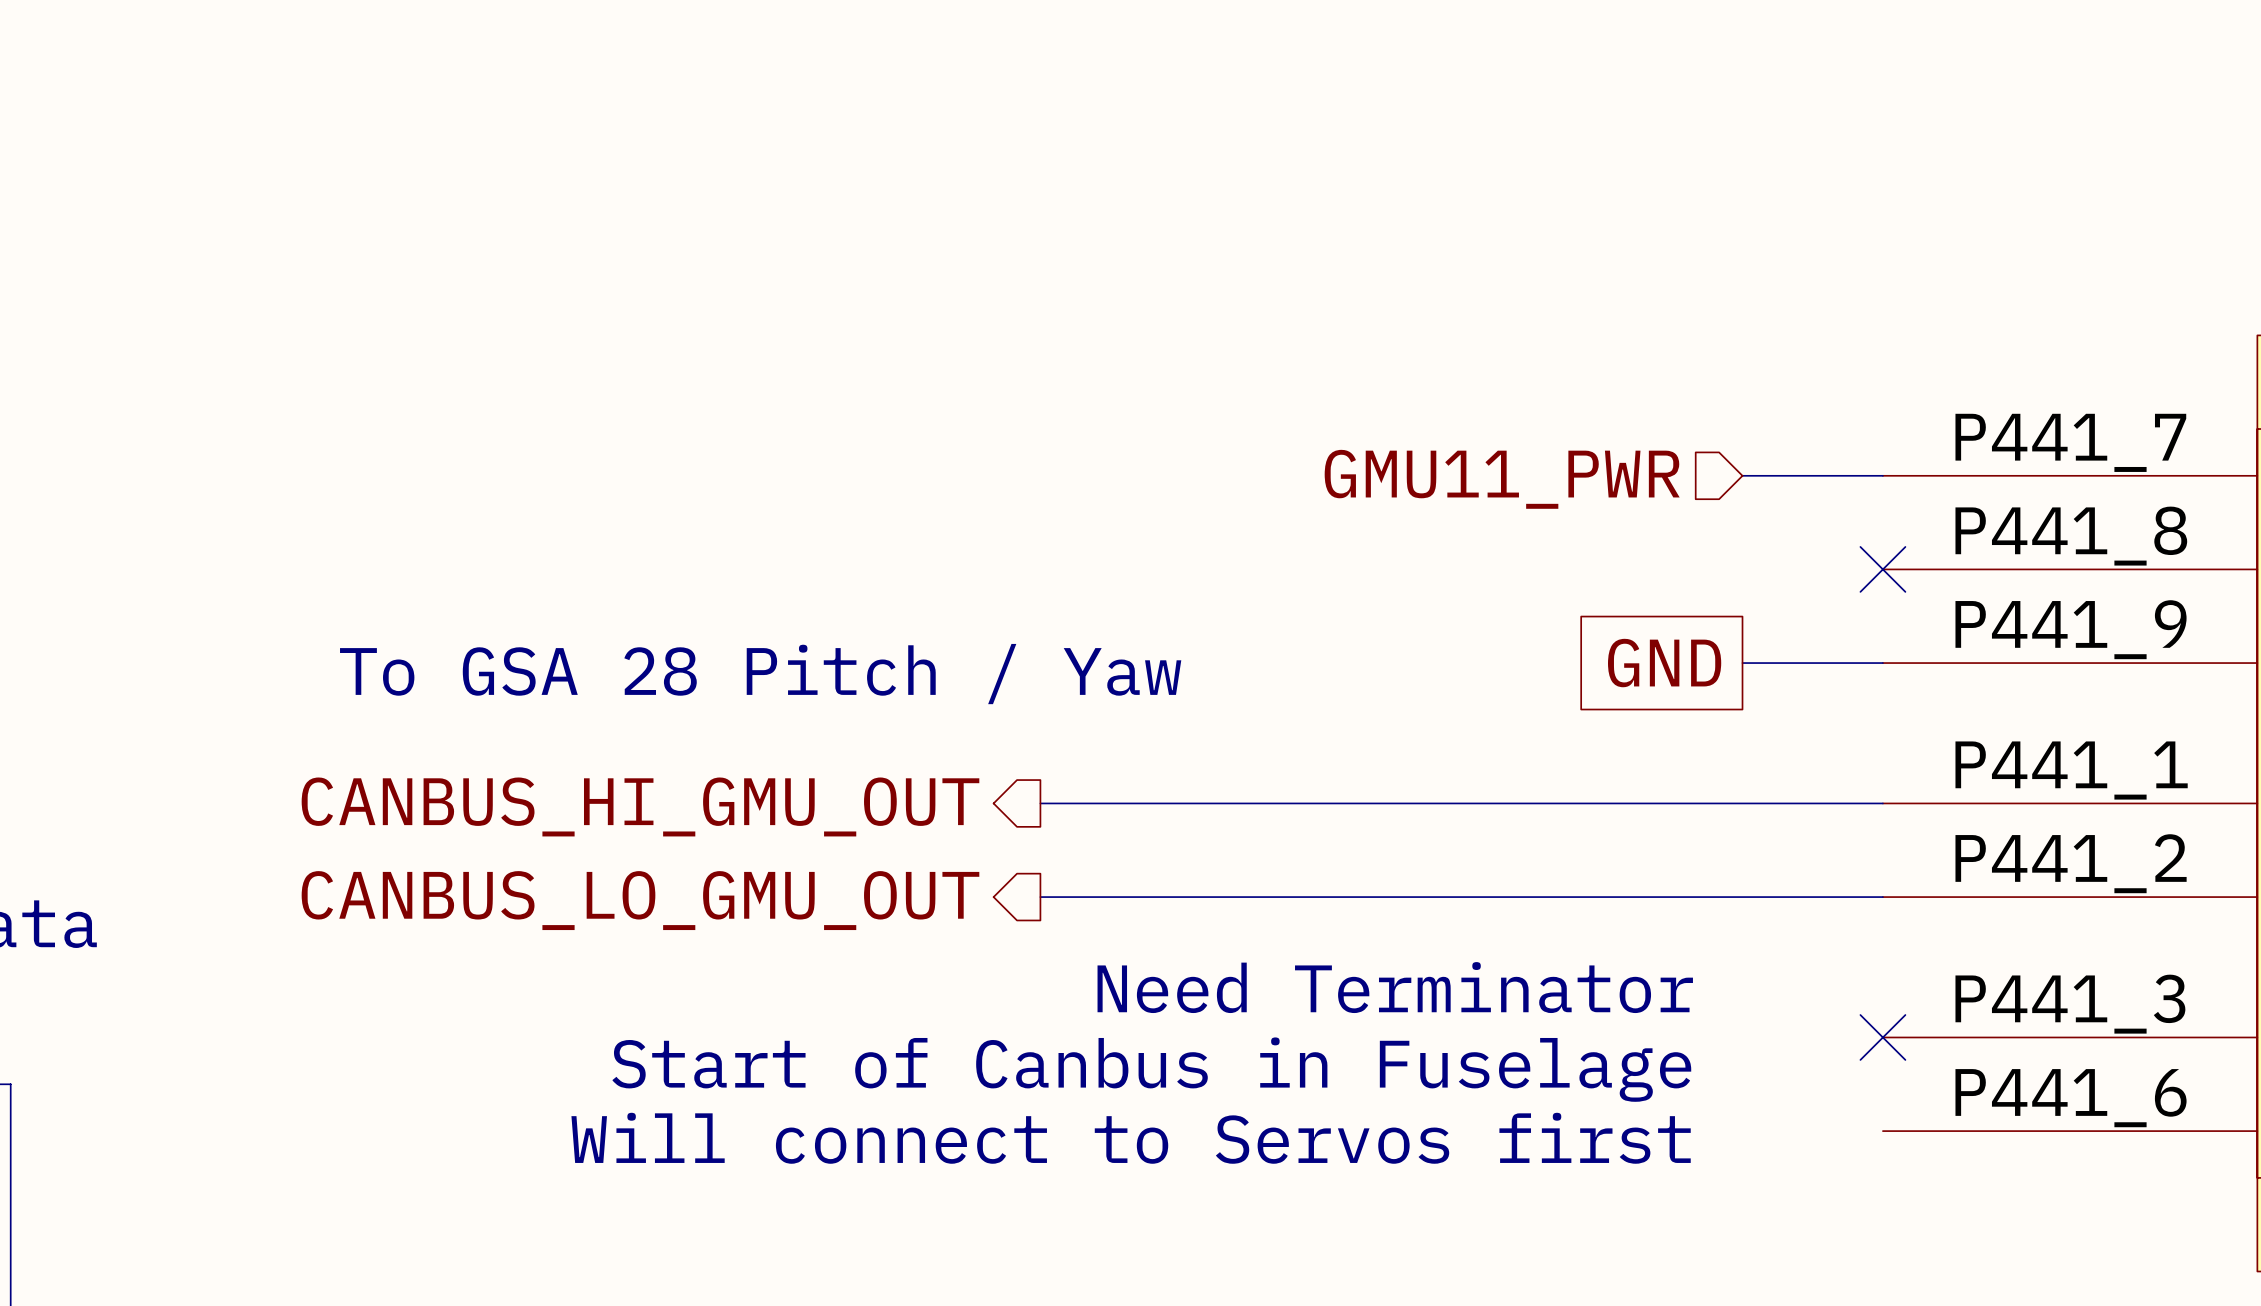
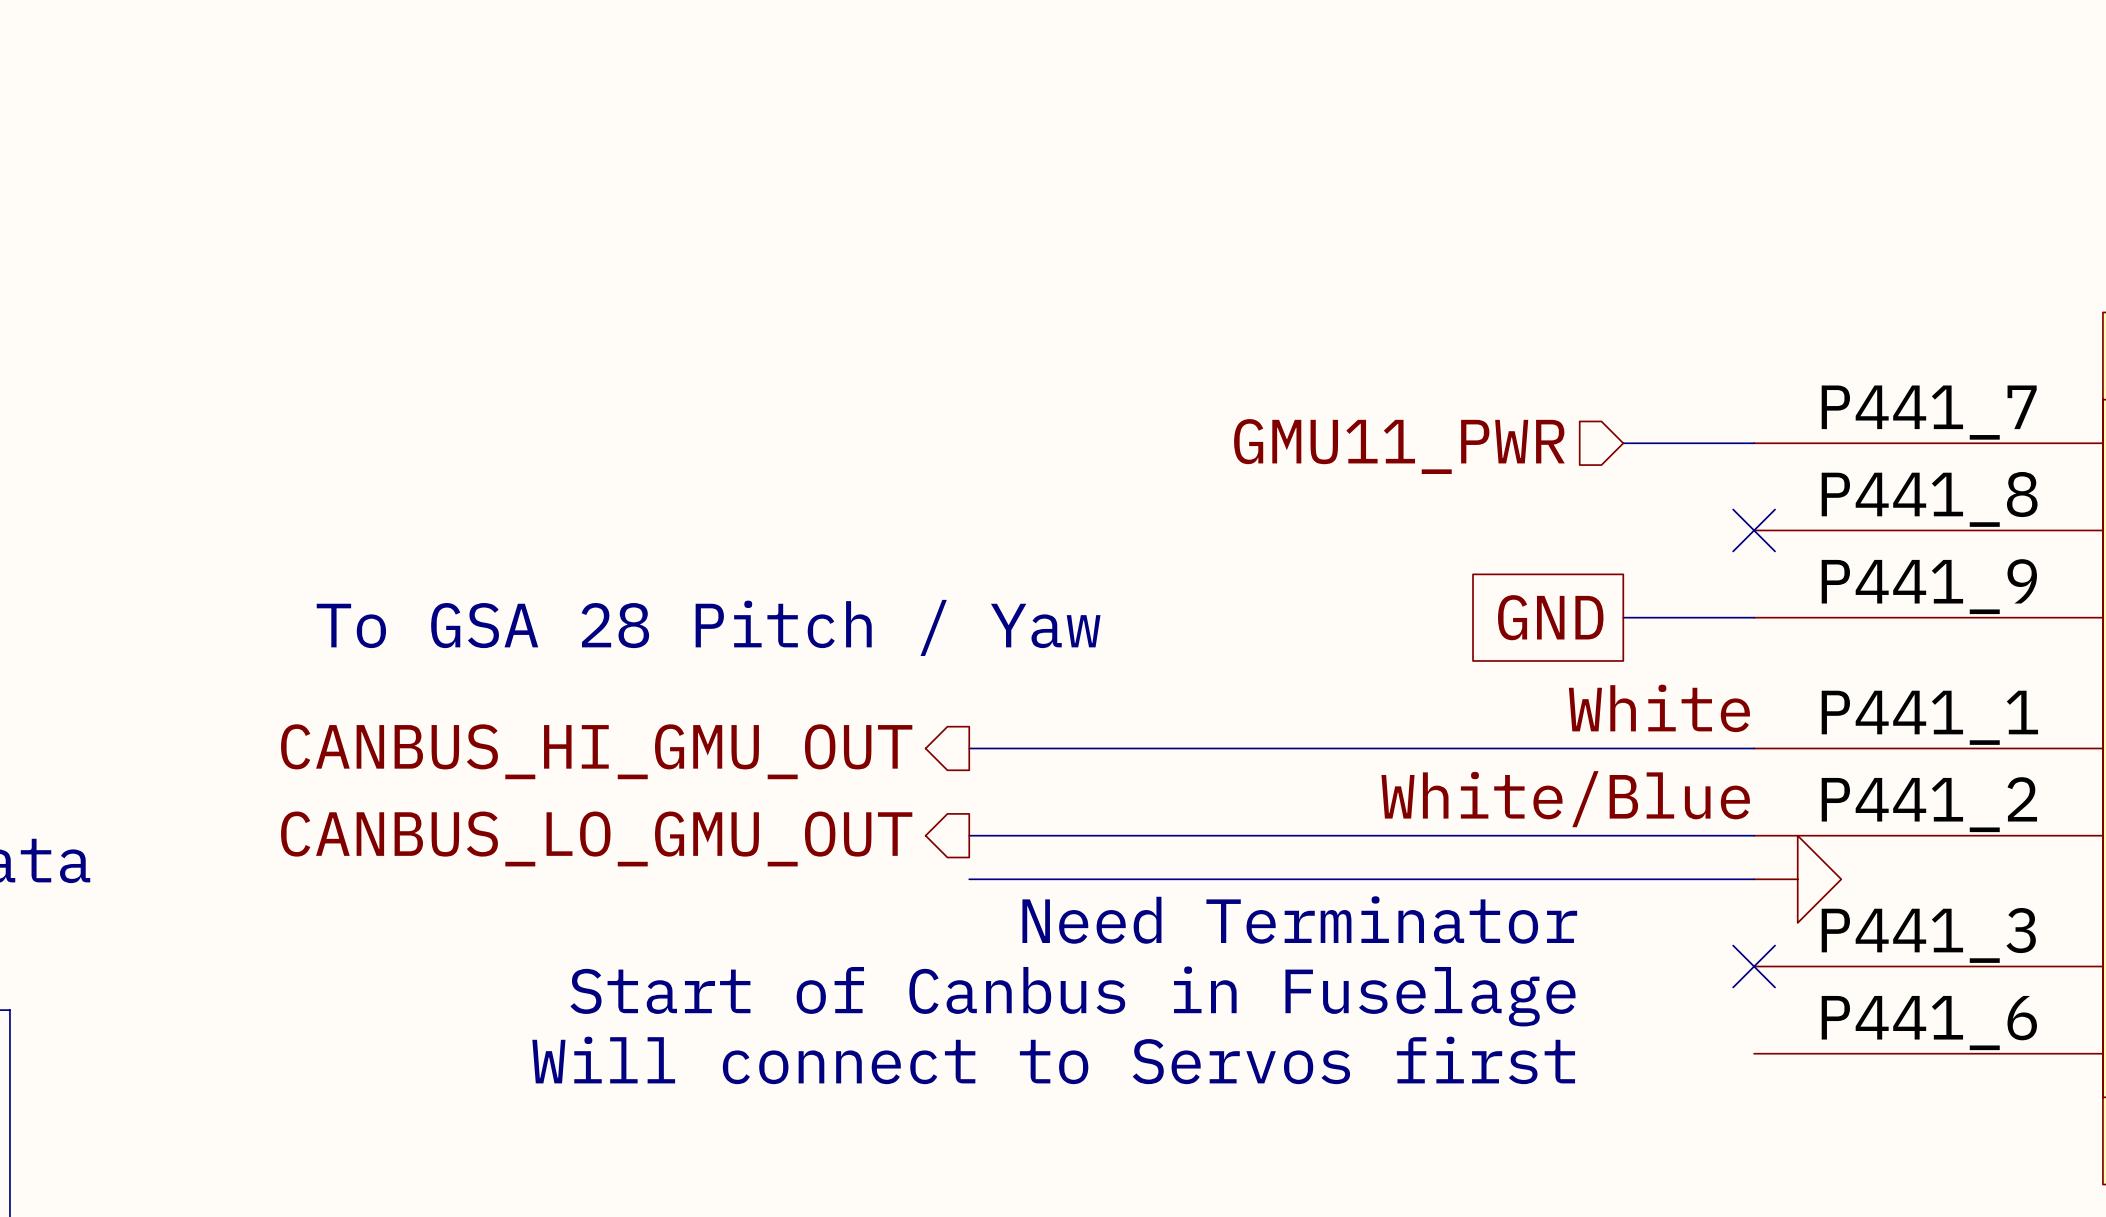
label: none -> White (1659, 708)
label: none -> White/Blue (1565, 799)
wire: none -> (969, 879) (1754, 879)
power symbol: none -> (1797, 879)

